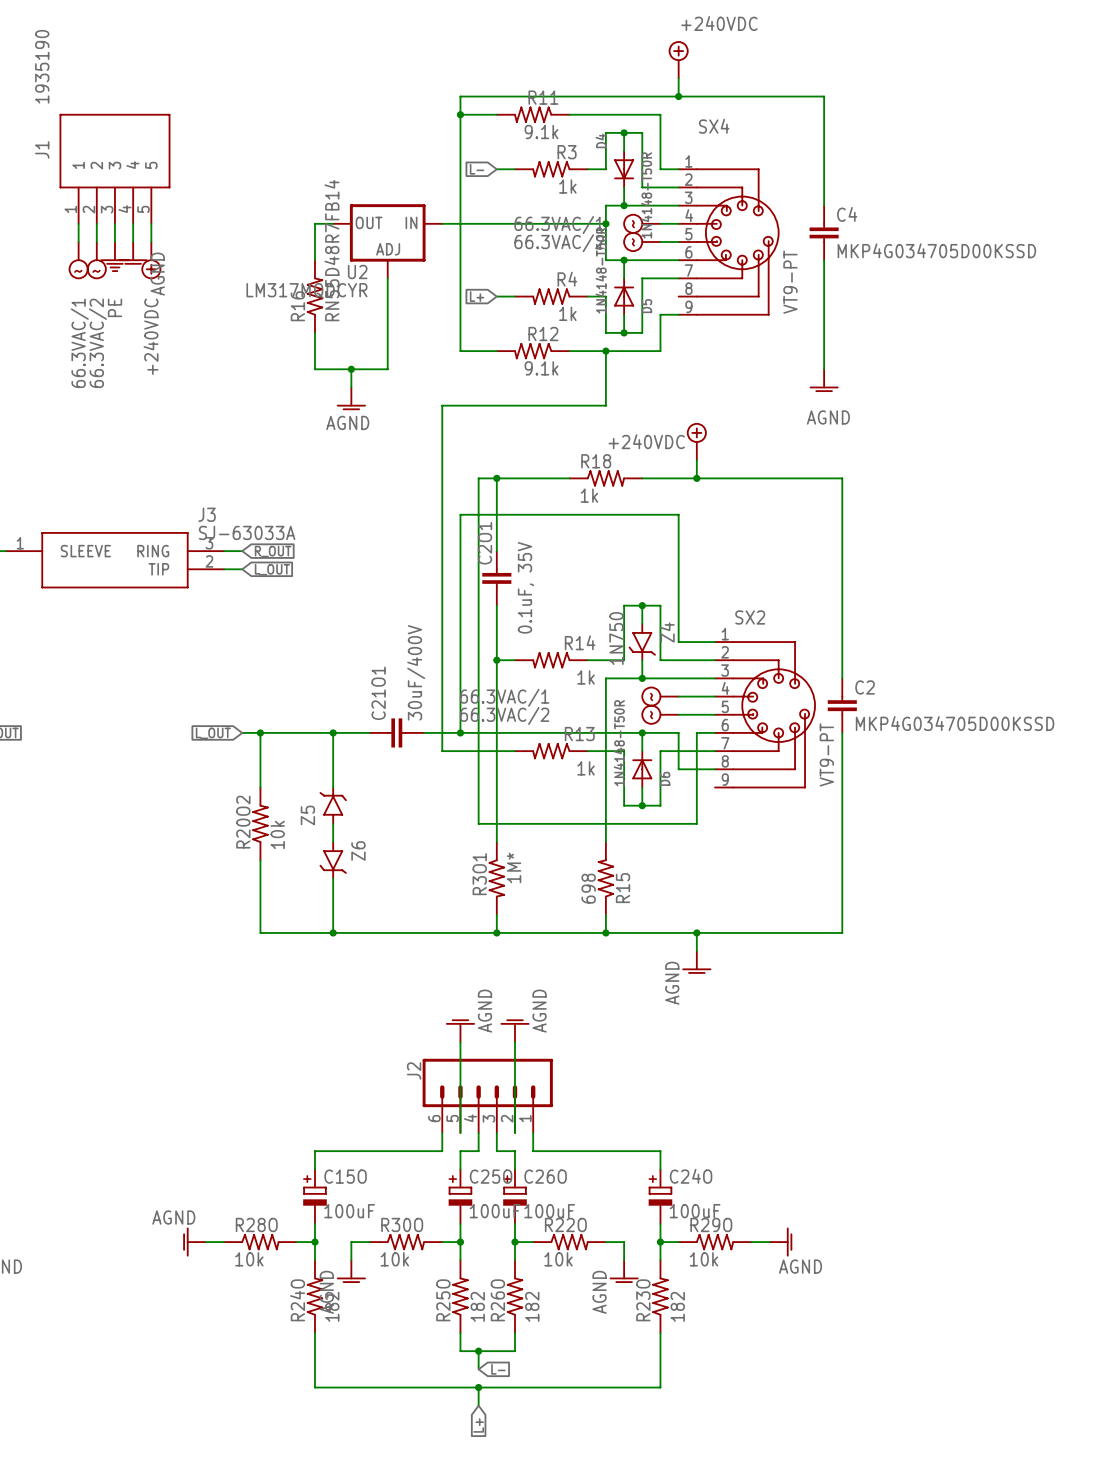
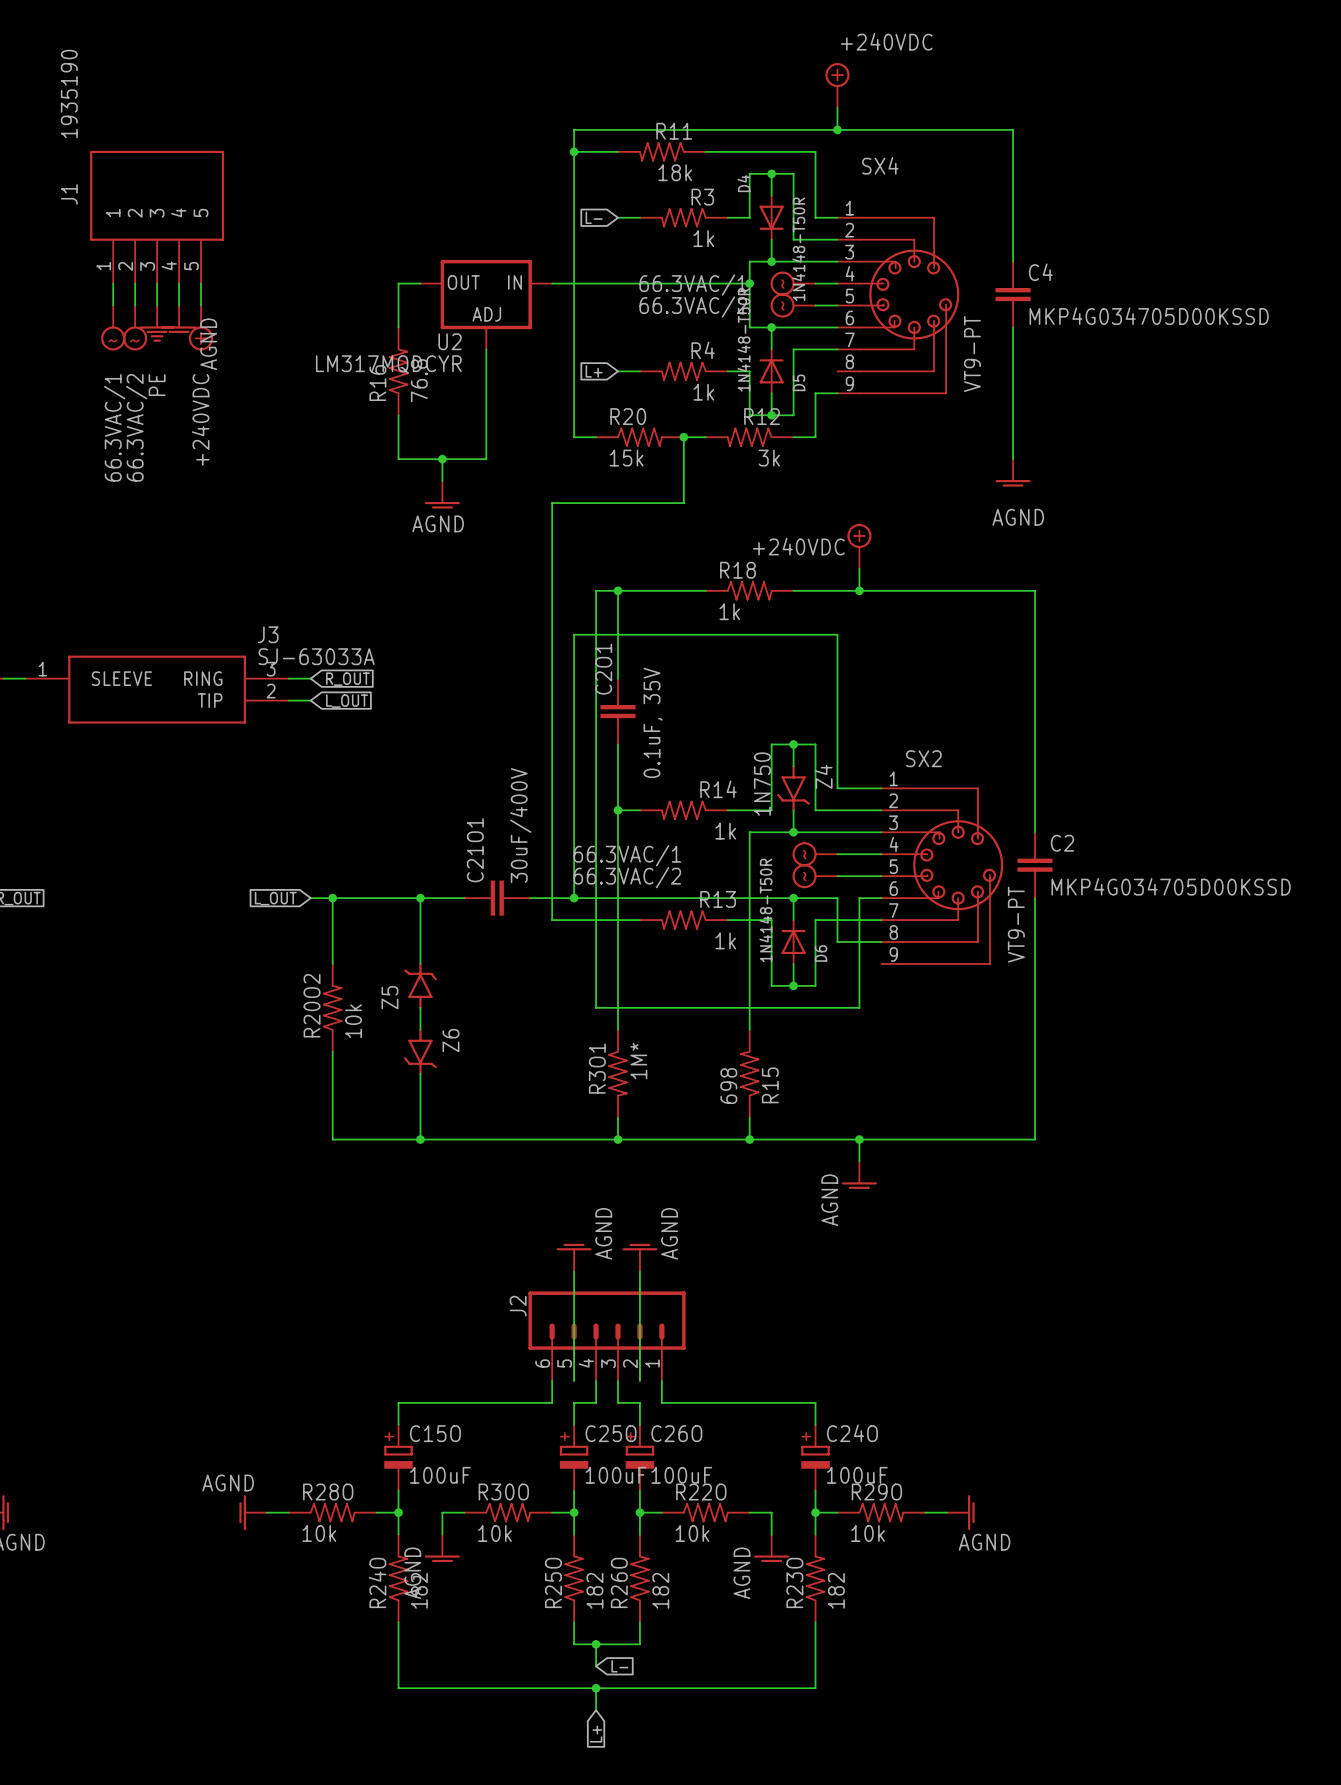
R11 value: 9.1k (541, 132) -> 18k (675, 172)
R16 value: RN55D48R7FB14 (331, 250) -> 76.8 (419, 380)
R20: none -> 15k (639, 437)
R12 position: (533, 351) -> (749, 437)
junction: none -> (683, 437)
wire: (605, 351) (605, 405) (551, 405) -> (705, 437) (683, 437) (683, 503)
junction: (605, 351) -> none
R12 value: 9.1k (541, 368) -> 3k (769, 458)

